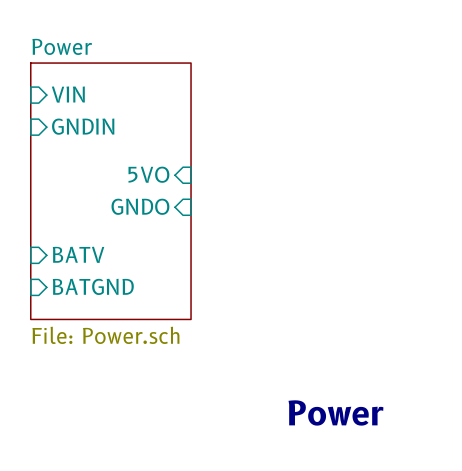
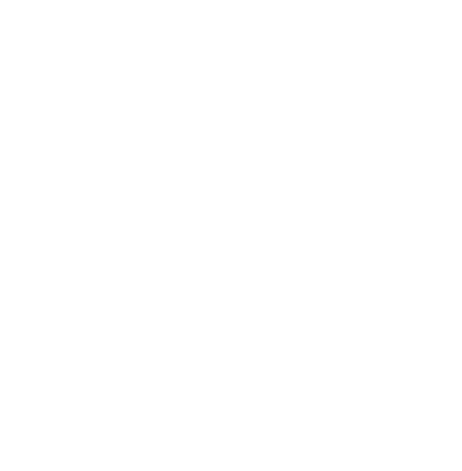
sheet pin: VIN (68, 94) -> none
sheet pin: GNDIN (83, 126) -> none
sheet pin: 5VO (148, 174) -> none
sheet Power: File: Power.sch (110, 191) -> none
sheet pin: GNDO (140, 206) -> none
sheet pin: BATV (78, 254) -> none
sheet pin: BATGND (93, 286) -> none
text: Power (335, 412) -> none

